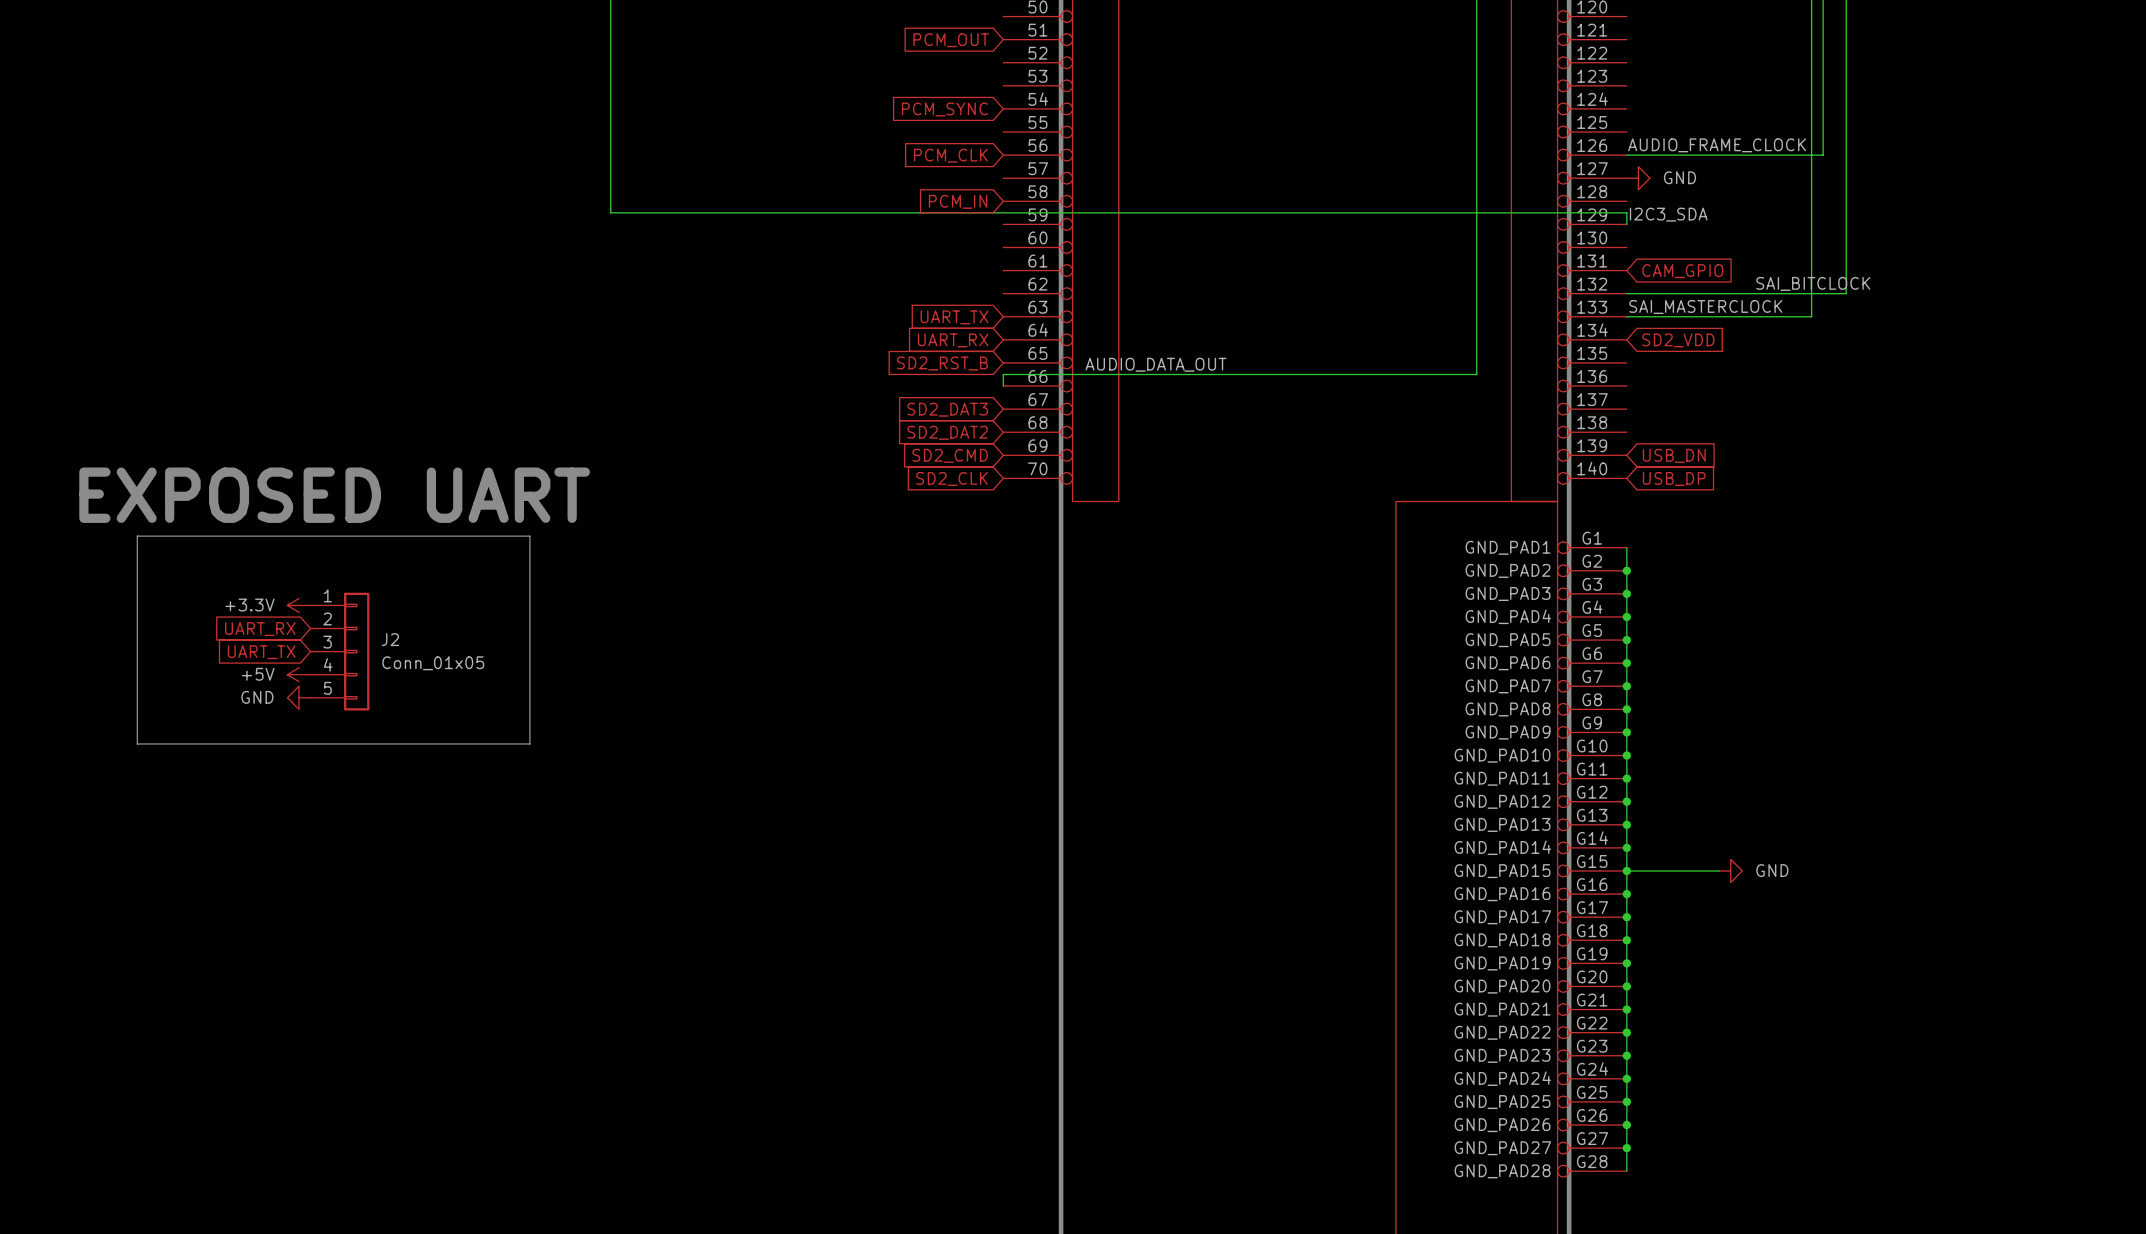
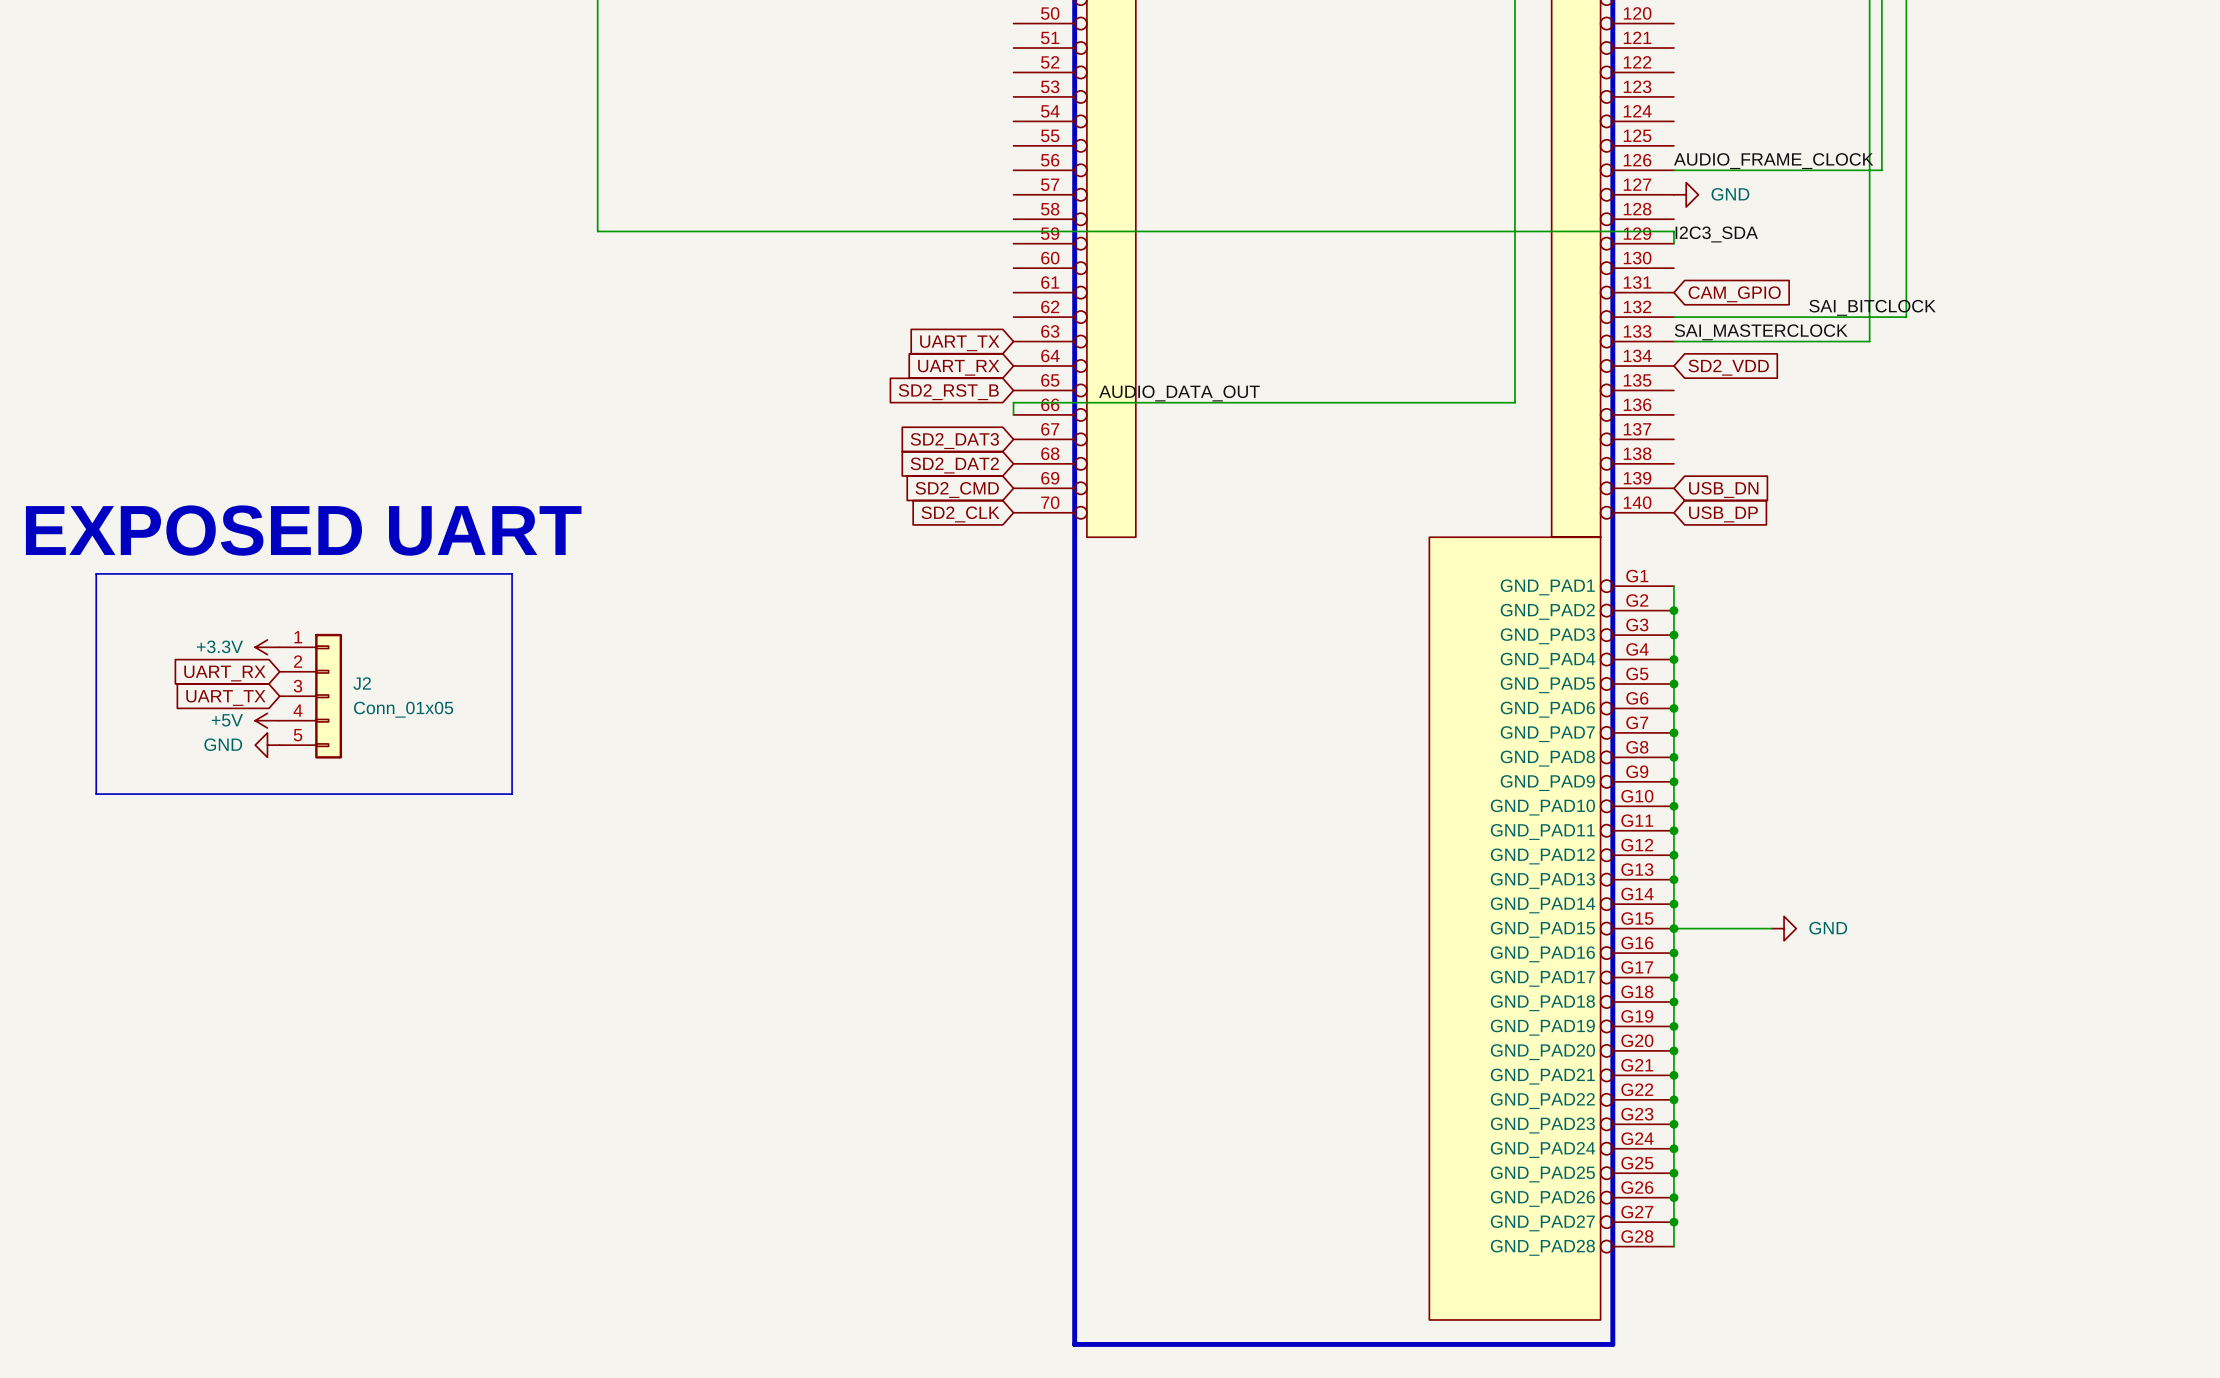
global label: PCM_OUT (951, 40) -> none
global label: PCM_SYNC (944, 109) -> none
global label: PCM_CLK (950, 155) -> none
global label: PCM_IN (958, 201) -> none

